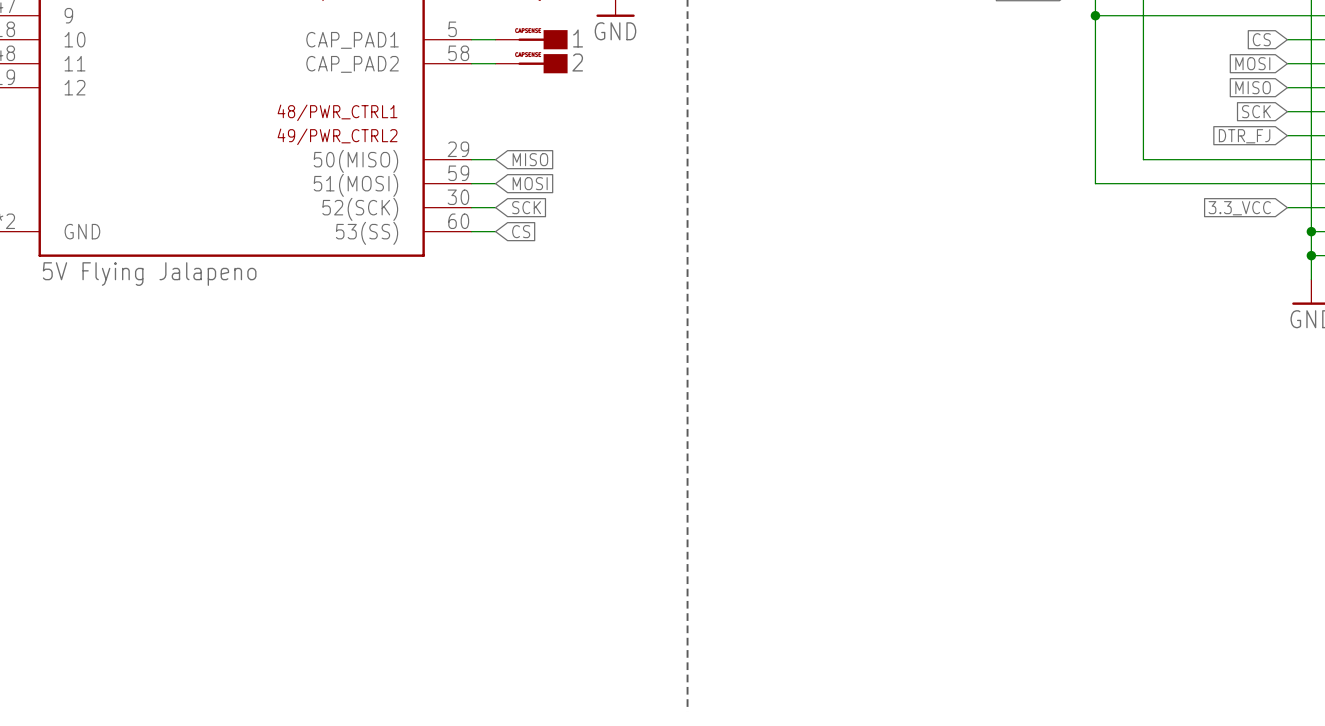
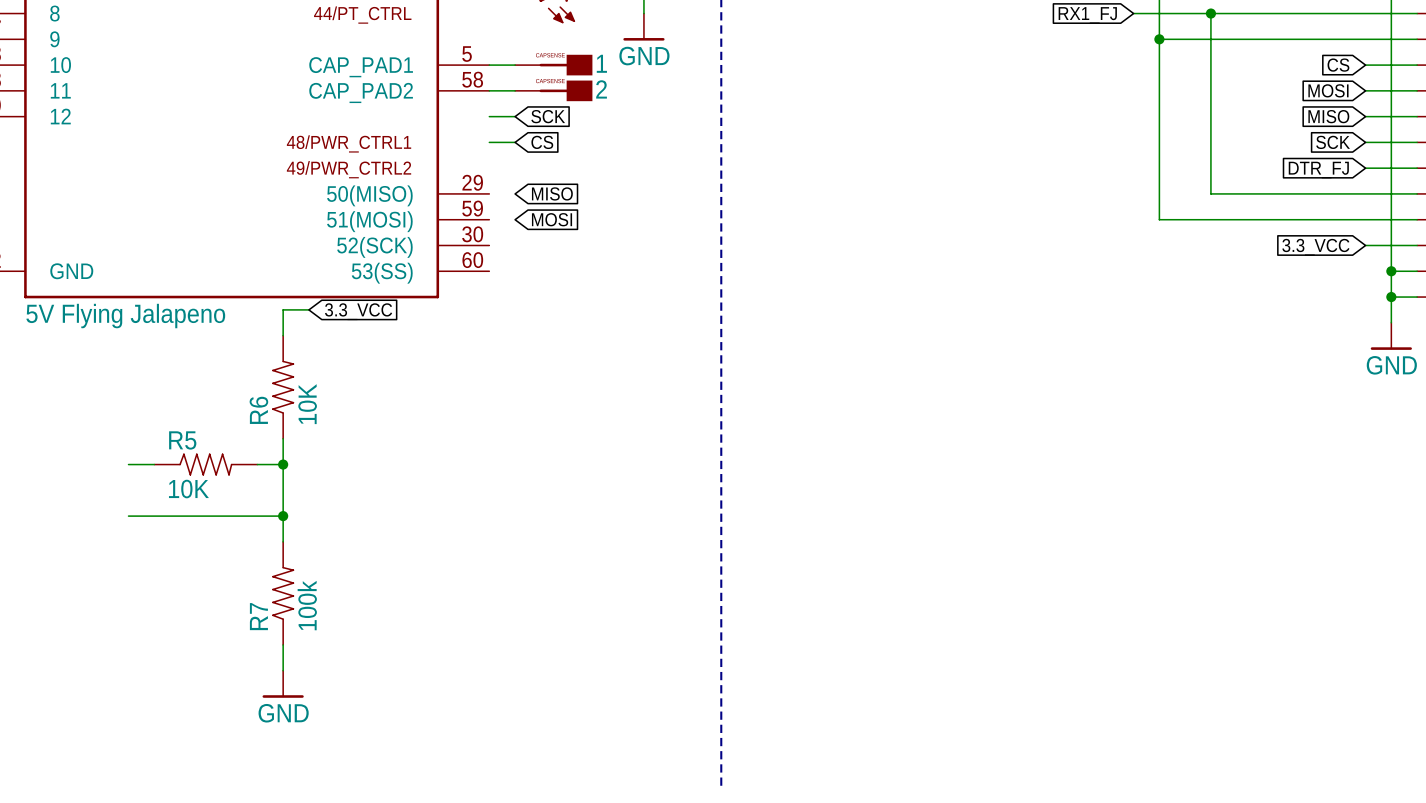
wire: (471, 159) (495, 159) -> none
wire: (471, 183) (495, 183) -> none
wire: (471, 207) (495, 207) -> (489, 116) (515, 116)
global label position: SCK (526, 207) -> SCK (548, 116)
wire: (471, 231) (495, 231) -> (489, 142) (515, 142)
global label position: CS (521, 231) -> CS (542, 142)
wire: none -> (308, 309) (283, 309) (283, 335)
global label: none -> 3.3_VCC (358, 311)
R6: none -> 10K (283, 387)
wire: none -> (283, 438) (283, 541)
wire: none -> (128, 464) (154, 464)
R5: none -> 10K (205, 464)
wire: none -> (257, 464) (283, 464)
junction: none -> (283, 464)
wire: none -> (128, 516) (283, 516)
junction: none -> (283, 516)
R7: none -> 100k (283, 593)
wire: none -> (283, 644) (283, 670)
power symbol: none -> GND (283, 684)

